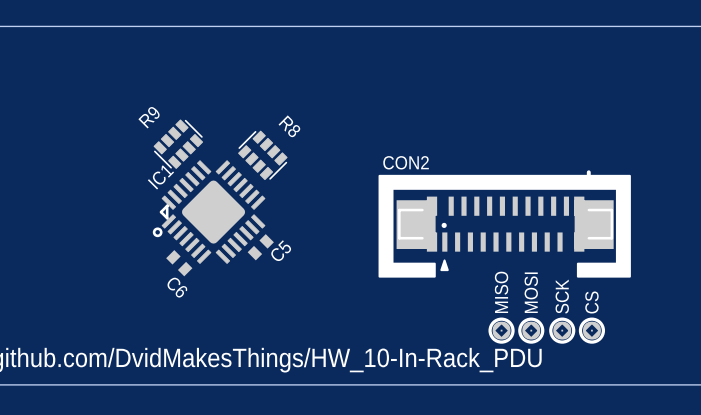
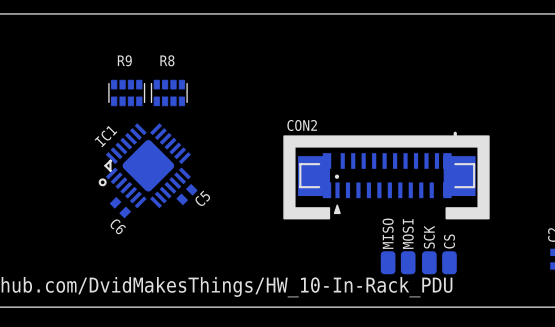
R9 rotation: 0° (178, 144) -> 45° clockwise (126, 92)
R8 rotation: 0° (262, 155) -> 45° counterclockwise (169, 92)
R8 position: (262, 155) -> (169, 92)
MISO footprint: [488, 317, 515, 344] -> [380, 251, 396, 275]
MOSI footprint: [518, 317, 545, 344] -> [400, 251, 416, 275]
SCK footprint: [549, 317, 576, 344] -> [422, 251, 437, 275]
CS footprint: [578, 317, 606, 344] -> [442, 251, 457, 275]

